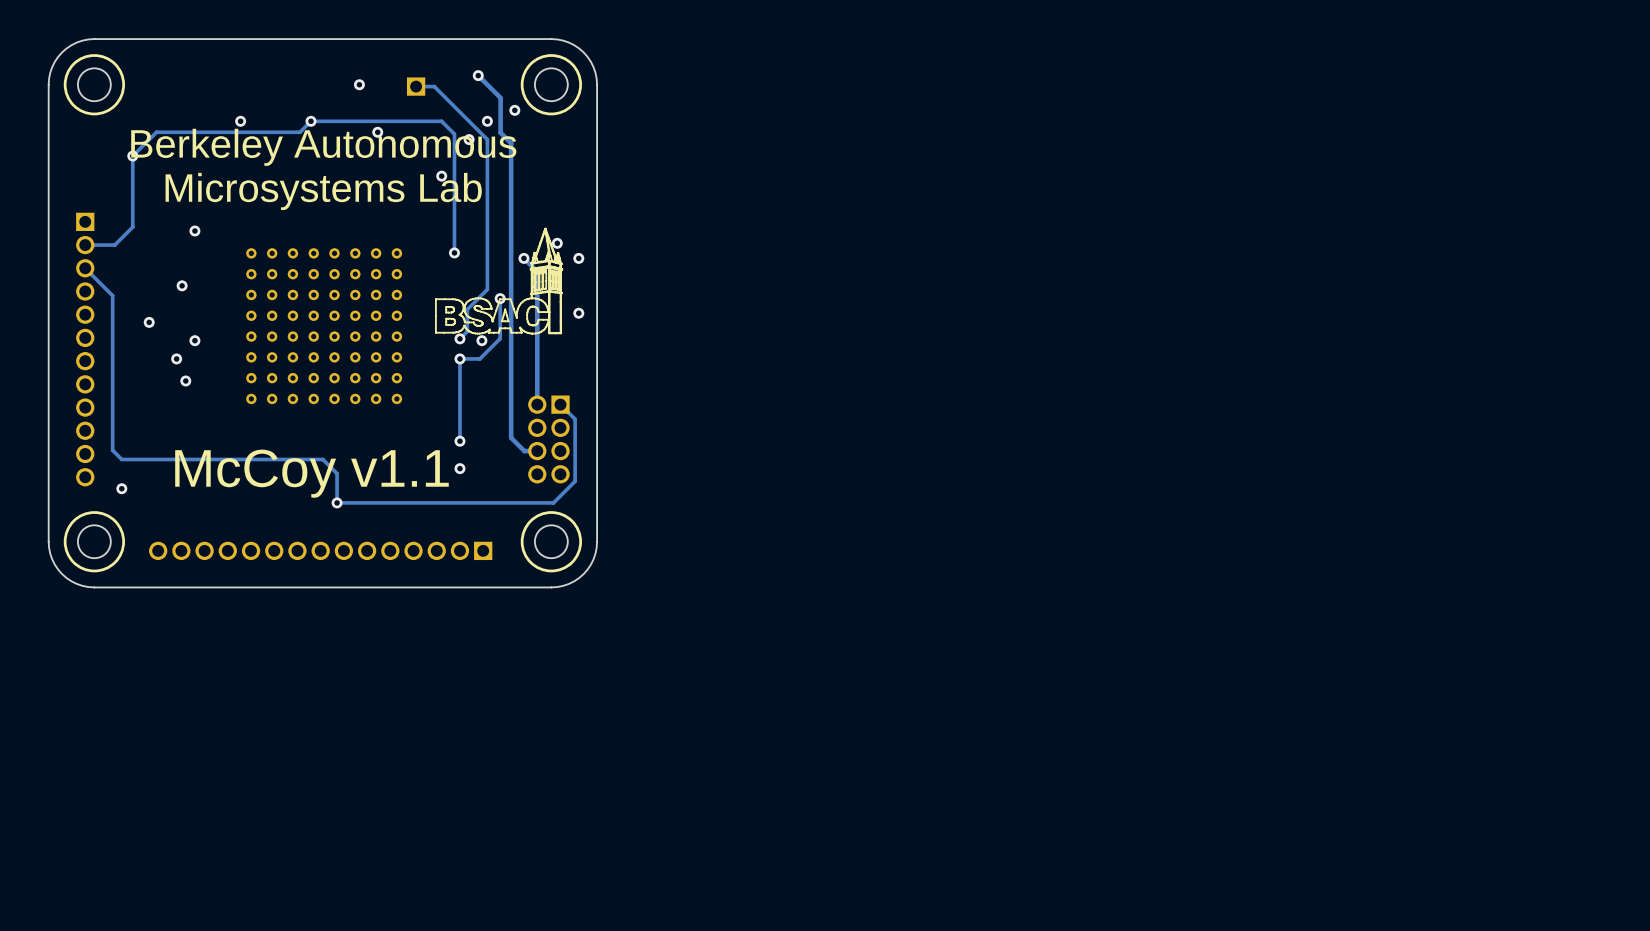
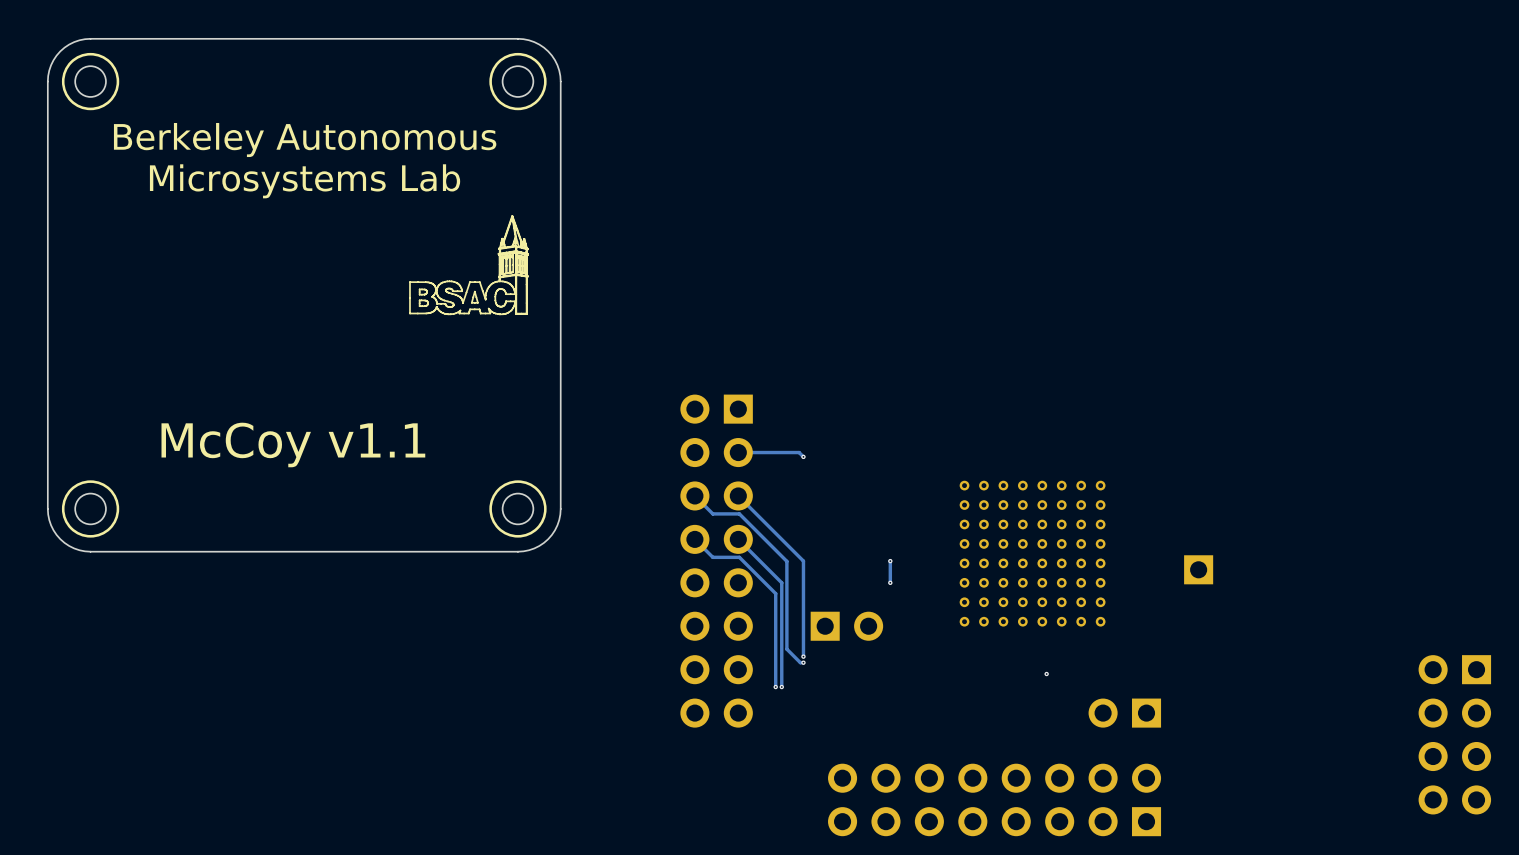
track: (478, 75) (500, 98) (500, 132) (511, 143) (511, 437) (524, 451) (537, 451) -> none
via: (478, 75) -> none
via: (359, 84) -> none
track: (416, 86) (434, 86) (487, 139) (487, 289) (467, 309) (467, 331) (459, 338) -> none
part: (416, 86) -> none
via: (514, 110) -> none
via: (240, 121) -> none
via: (310, 121) -> none
via: (487, 121) -> none
via: (377, 132) -> none
via: (469, 139) -> none
via: (132, 156) -> none
via: (441, 176) -> none
via: (194, 230) -> none
via: (557, 243) -> none
track: (85, 245) (114, 245) (132, 227) (132, 156) (156, 132) (300, 132) (310, 121) (441, 121) (454, 134) (454, 252) -> none
via: (454, 252) -> none
track: (523, 258) (537, 271) (537, 404) -> none
via: (523, 258) -> none
via: (578, 258) -> none
track: (85, 268) (112, 295) (112, 450) (121, 459) (322, 459) (337, 473) (337, 502) (553, 502) (575, 481) (575, 419) (560, 404) -> none
via: (182, 285) -> none
track: (500, 298) (500, 338) (479, 358) (459, 358) (459, 441) -> none
via: (500, 298) -> none
via: (578, 313) -> none
via: (149, 322) -> none
part: (324, 326) -> none
via: (459, 338) -> none
via: (194, 340) -> none
via: (481, 340) -> none
part: (85, 349) -> none
via: (176, 358) -> none
via: (459, 358) -> none
via: (185, 381) -> none
part: (548, 439) -> none
via: (459, 441) -> none
via: (459, 468) -> none
track: none -> (738, 452) (799, 452) (803, 456)
via: none -> (803, 456)
via: (121, 488) -> none
via: (337, 502) -> none
track: none -> (694, 495) (712, 513) (739, 513) (786, 561) (786, 649) (800, 662) (803, 662)
track: none -> (738, 495) (803, 561) (803, 656)
part: (320, 550) -> none
track: none -> (694, 539) (712, 557) (739, 557) (775, 593) (775, 687)
track: none -> (738, 539) (781, 582) (781, 687)
part: none -> (1032, 553)
part: none -> (716, 561)
track: none -> (890, 561) (890, 582)
via: none -> (890, 561)
part: none -> (1198, 569)
via: none -> (890, 582)
part: none -> (846, 626)
via: none -> (803, 656)
via: none -> (803, 662)
via: none -> (1046, 674)
via: none -> (775, 687)
via: none -> (781, 687)
part: none -> (1124, 713)
part: none -> (1454, 734)
part: none -> (994, 799)

